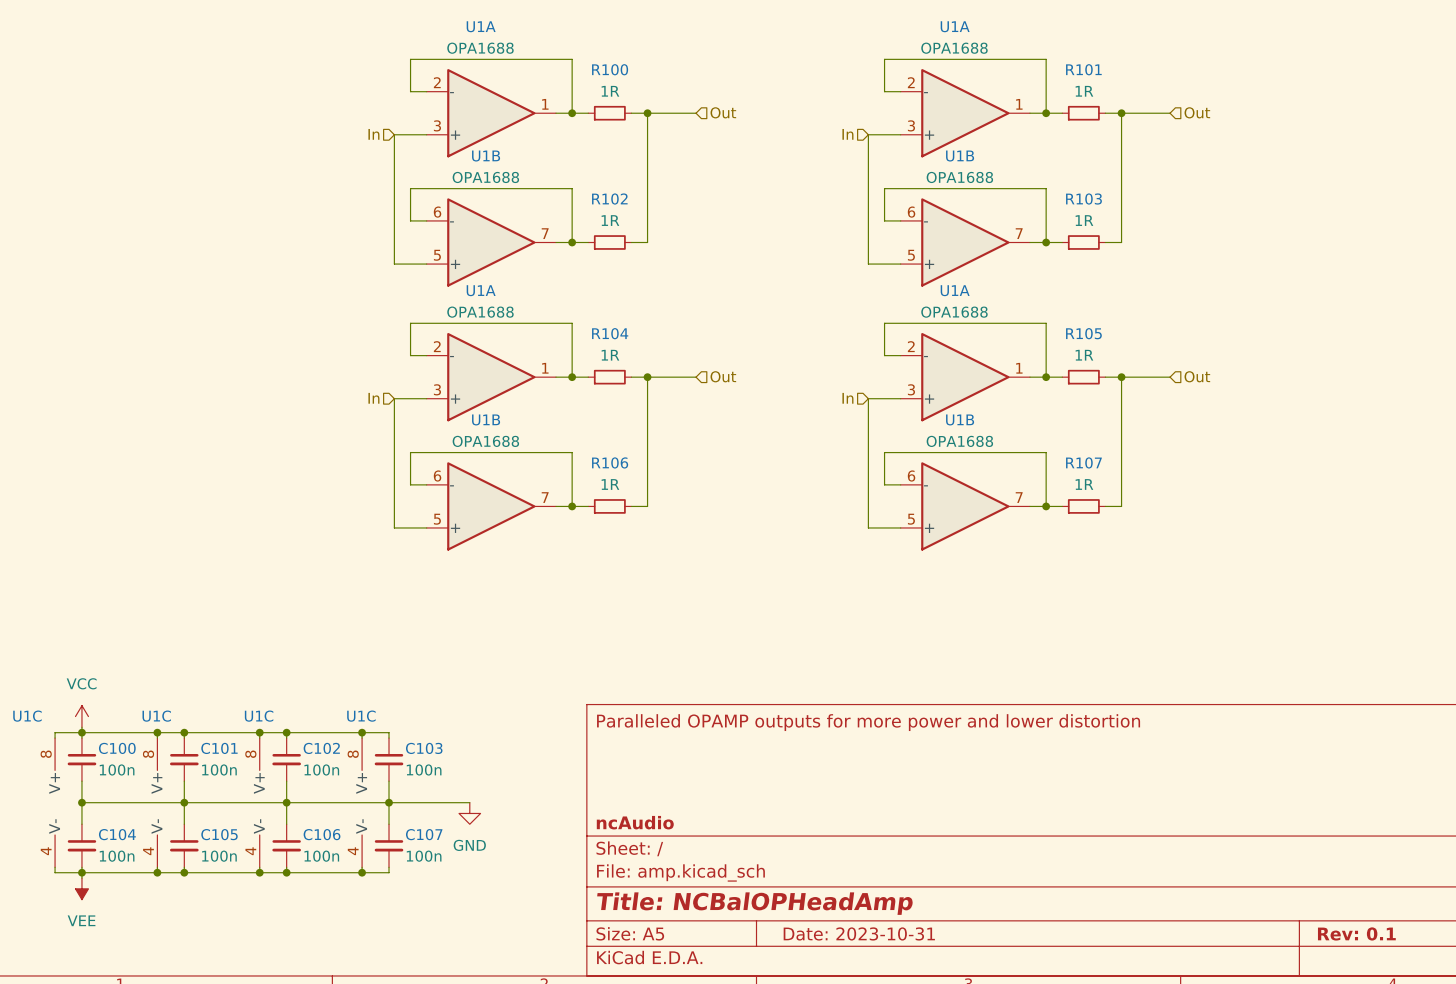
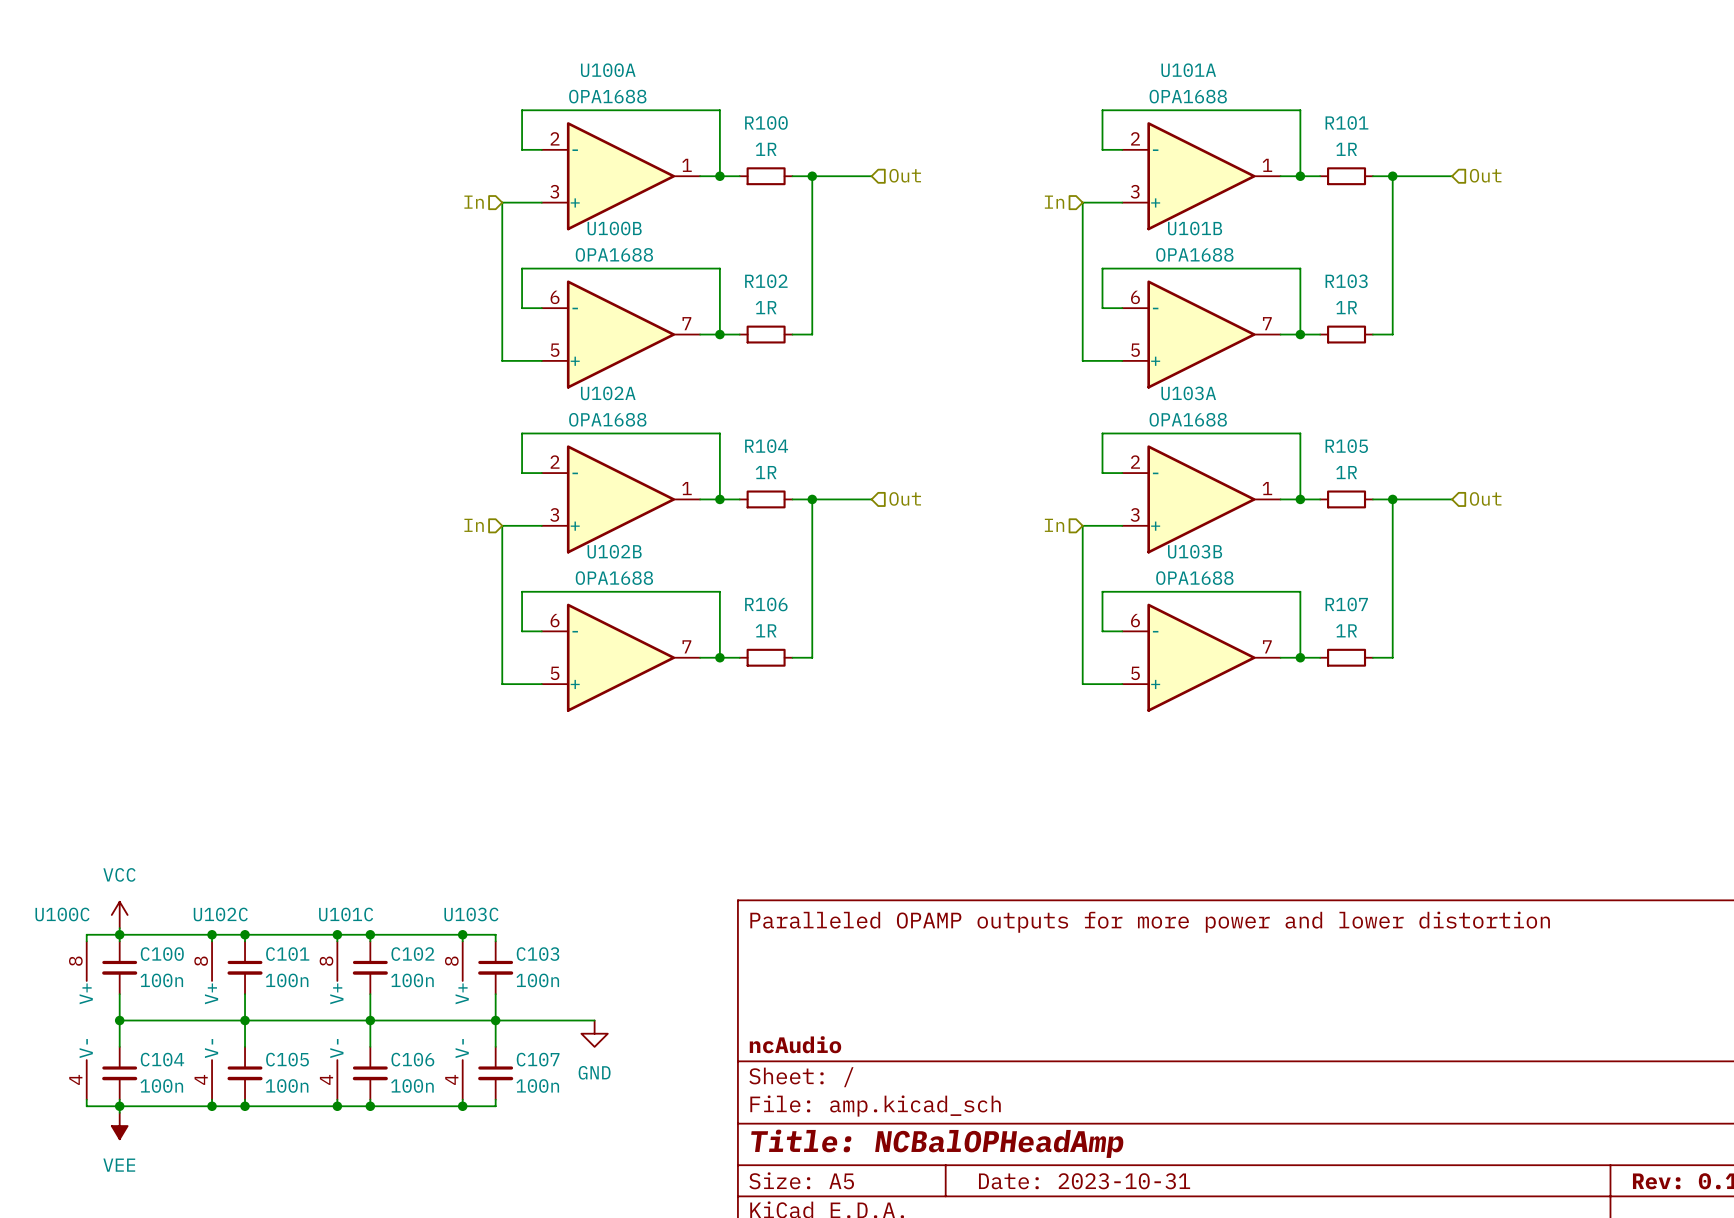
U1A name: U1A (481, 26) -> U100A (608, 70)
U1A name: U1A (955, 26) -> U101A (1188, 70)
U1B name: U1B (486, 156) -> U100B (614, 228)
U1B name: U1B (960, 156) -> U101B (1195, 228)
U1A name: U1A (481, 290) -> U102A (608, 393)
U1A name: U1A (955, 290) -> U103A (1188, 393)
U1B name: U1B (486, 419) -> U102B (614, 551)
U1B name: U1B (960, 419) -> U103B (1195, 551)
U1C name: U1C (27, 716) -> U100C (62, 914)
U1C name: U1C (156, 716) -> U102C (220, 914)
U1C name: U1C (259, 716) -> U101C (346, 914)
U1C name: U1C (361, 716) -> U103C (471, 914)

